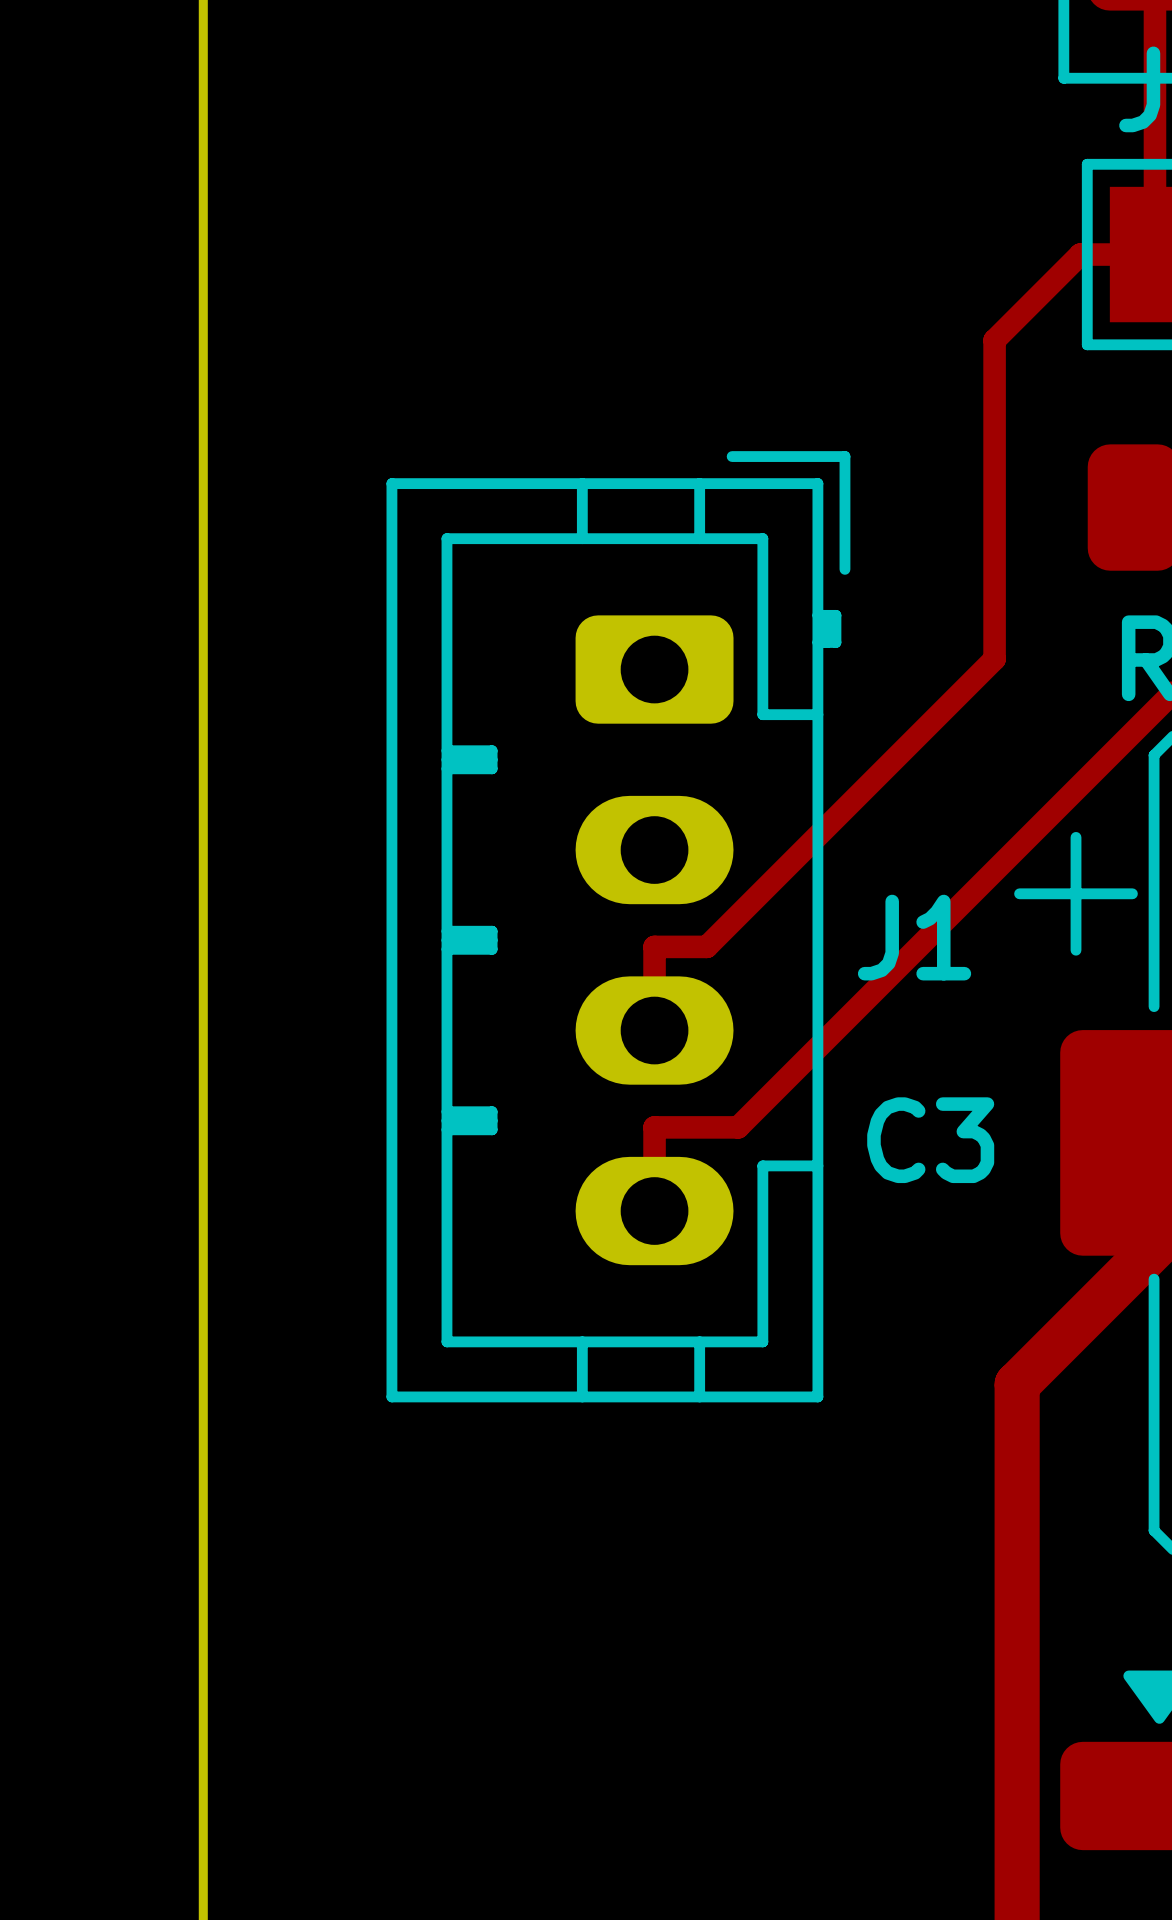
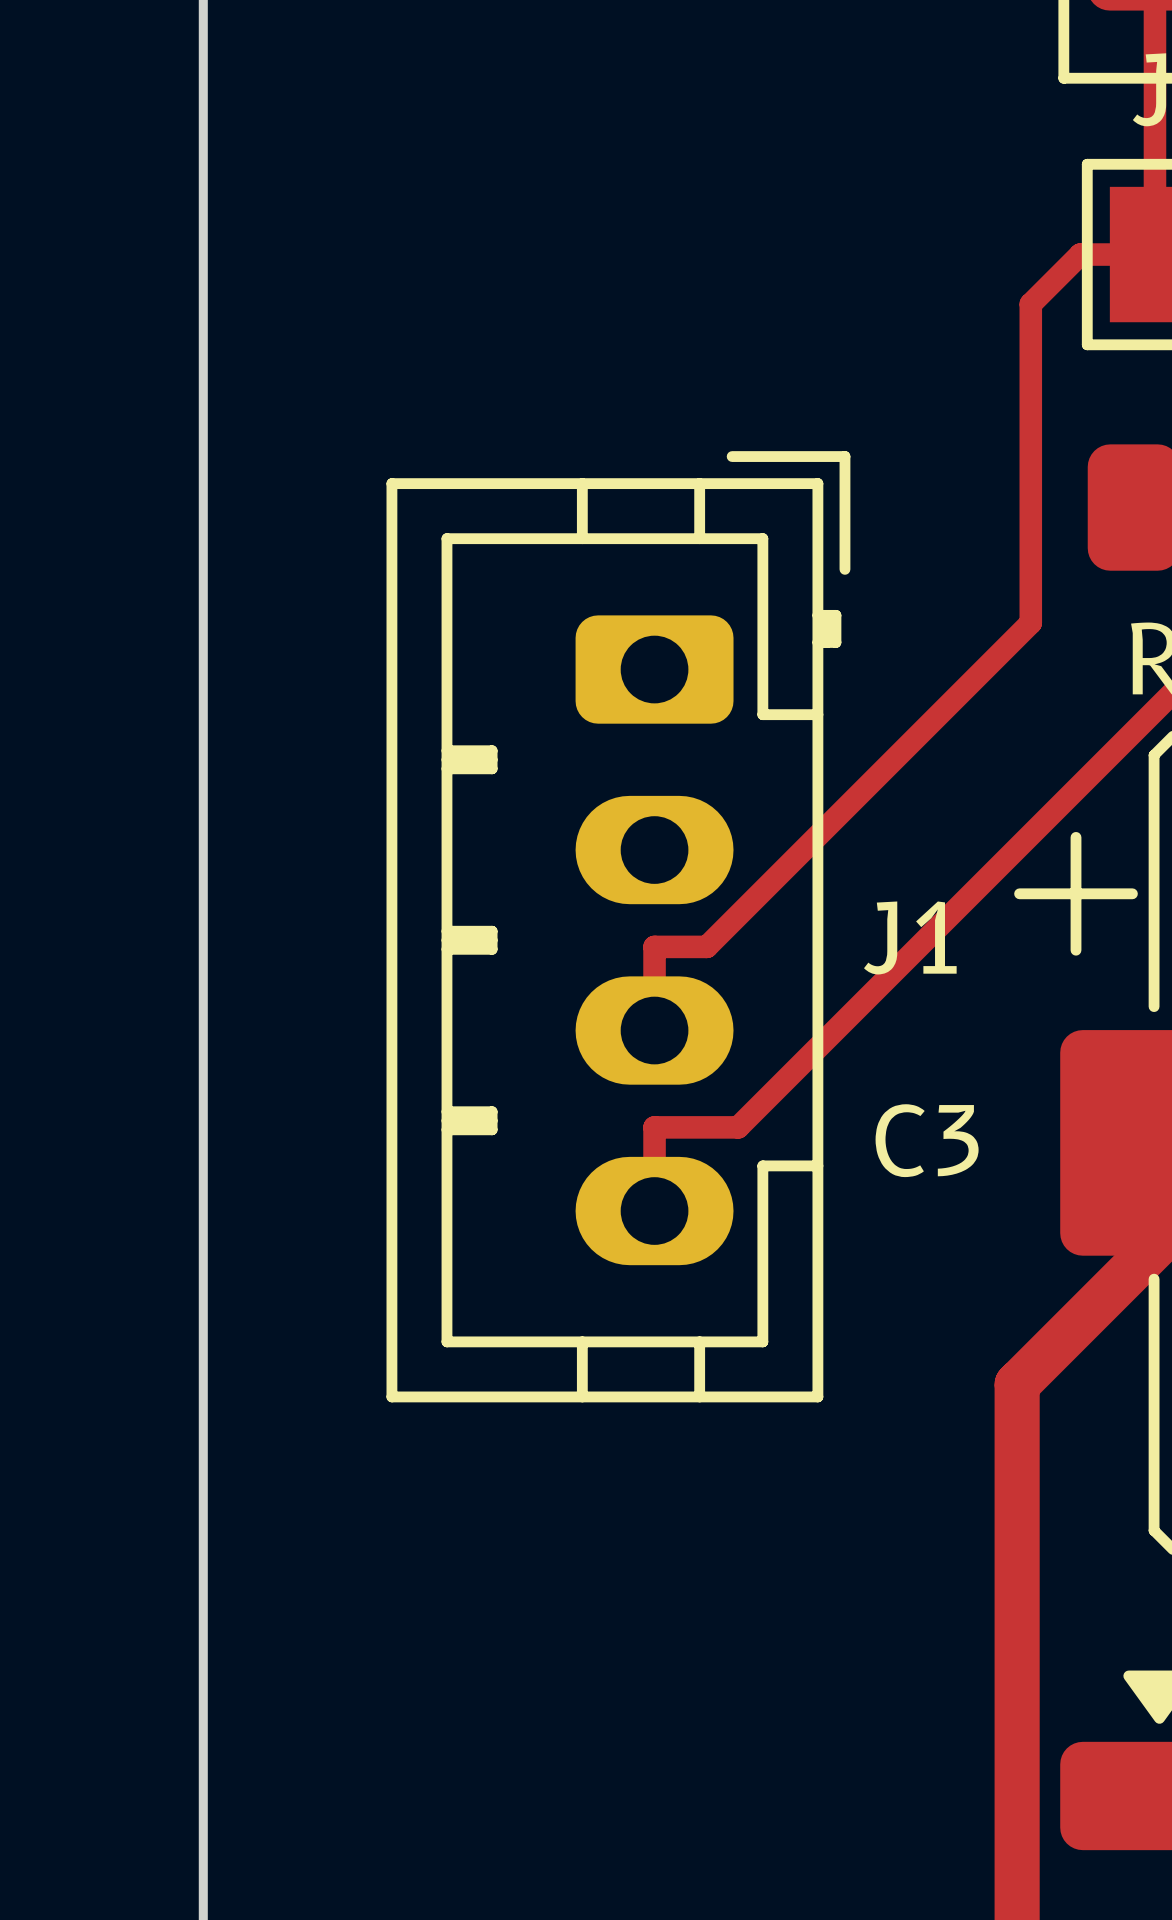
track: (1030, 304) (994, 340) (994, 659) -> (1030, 304) (1030, 622) (994, 659)

